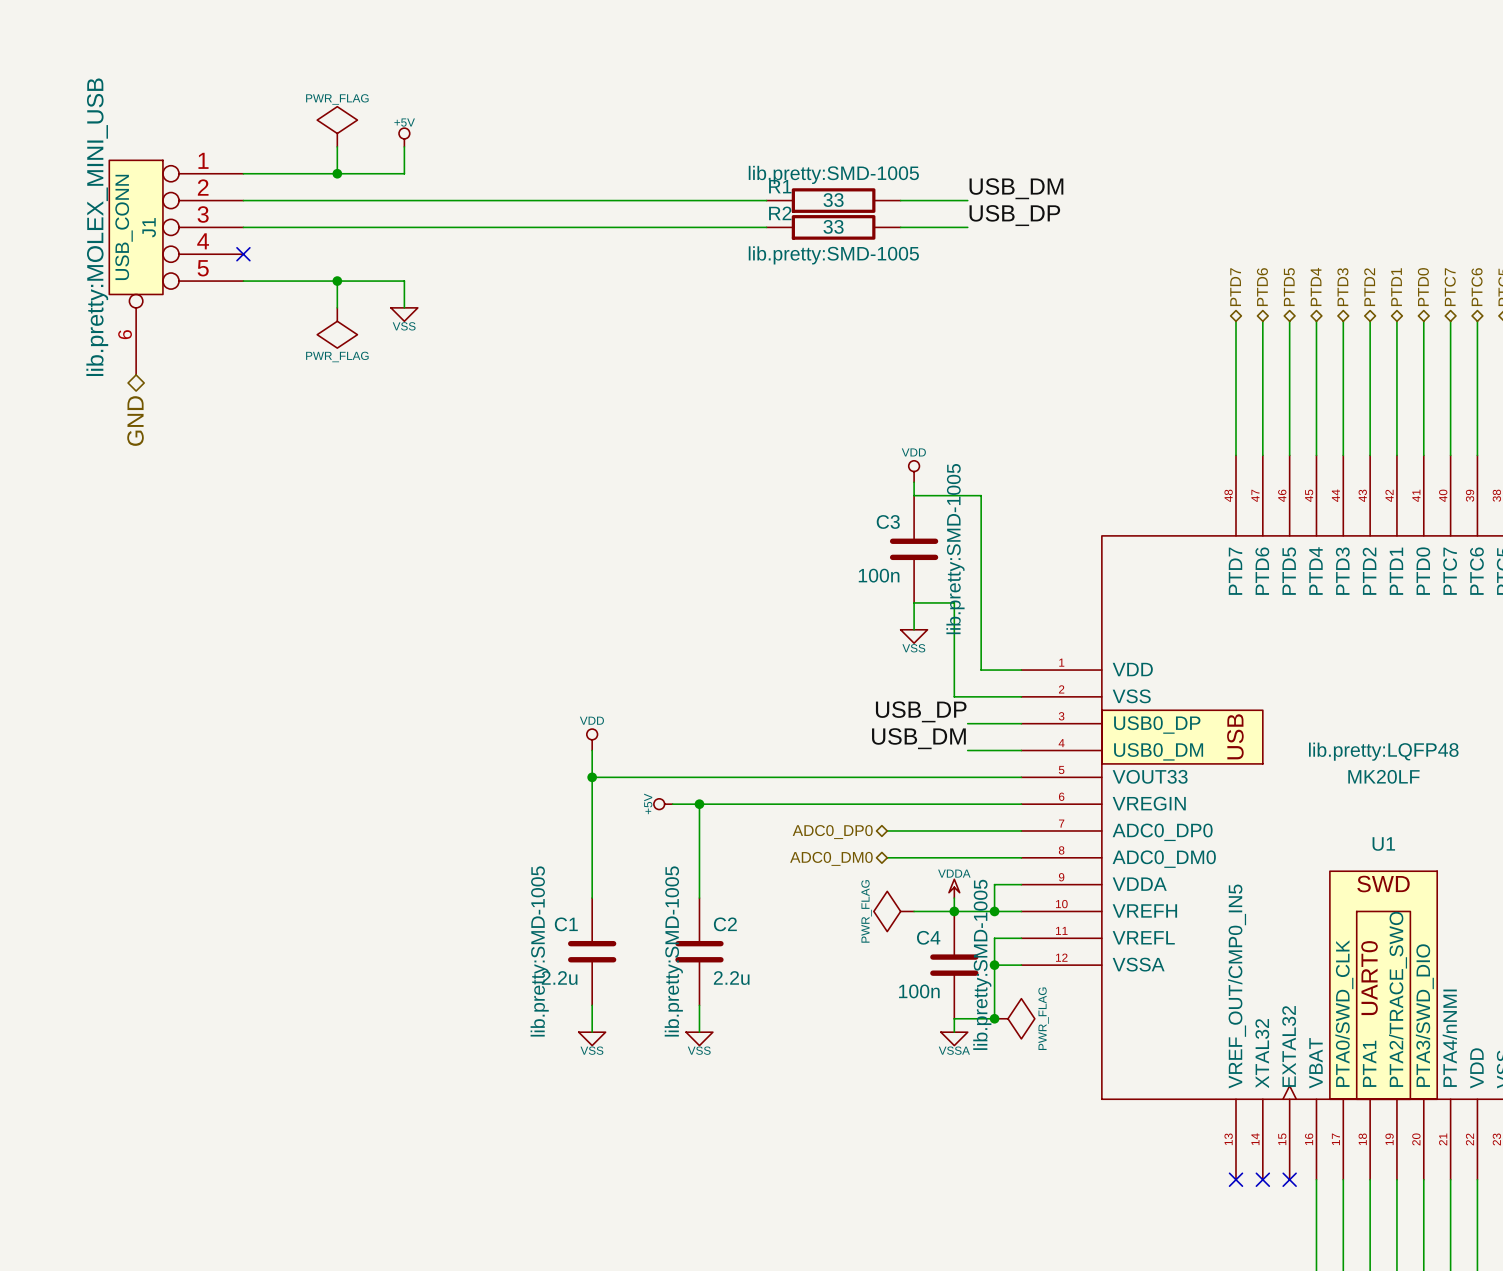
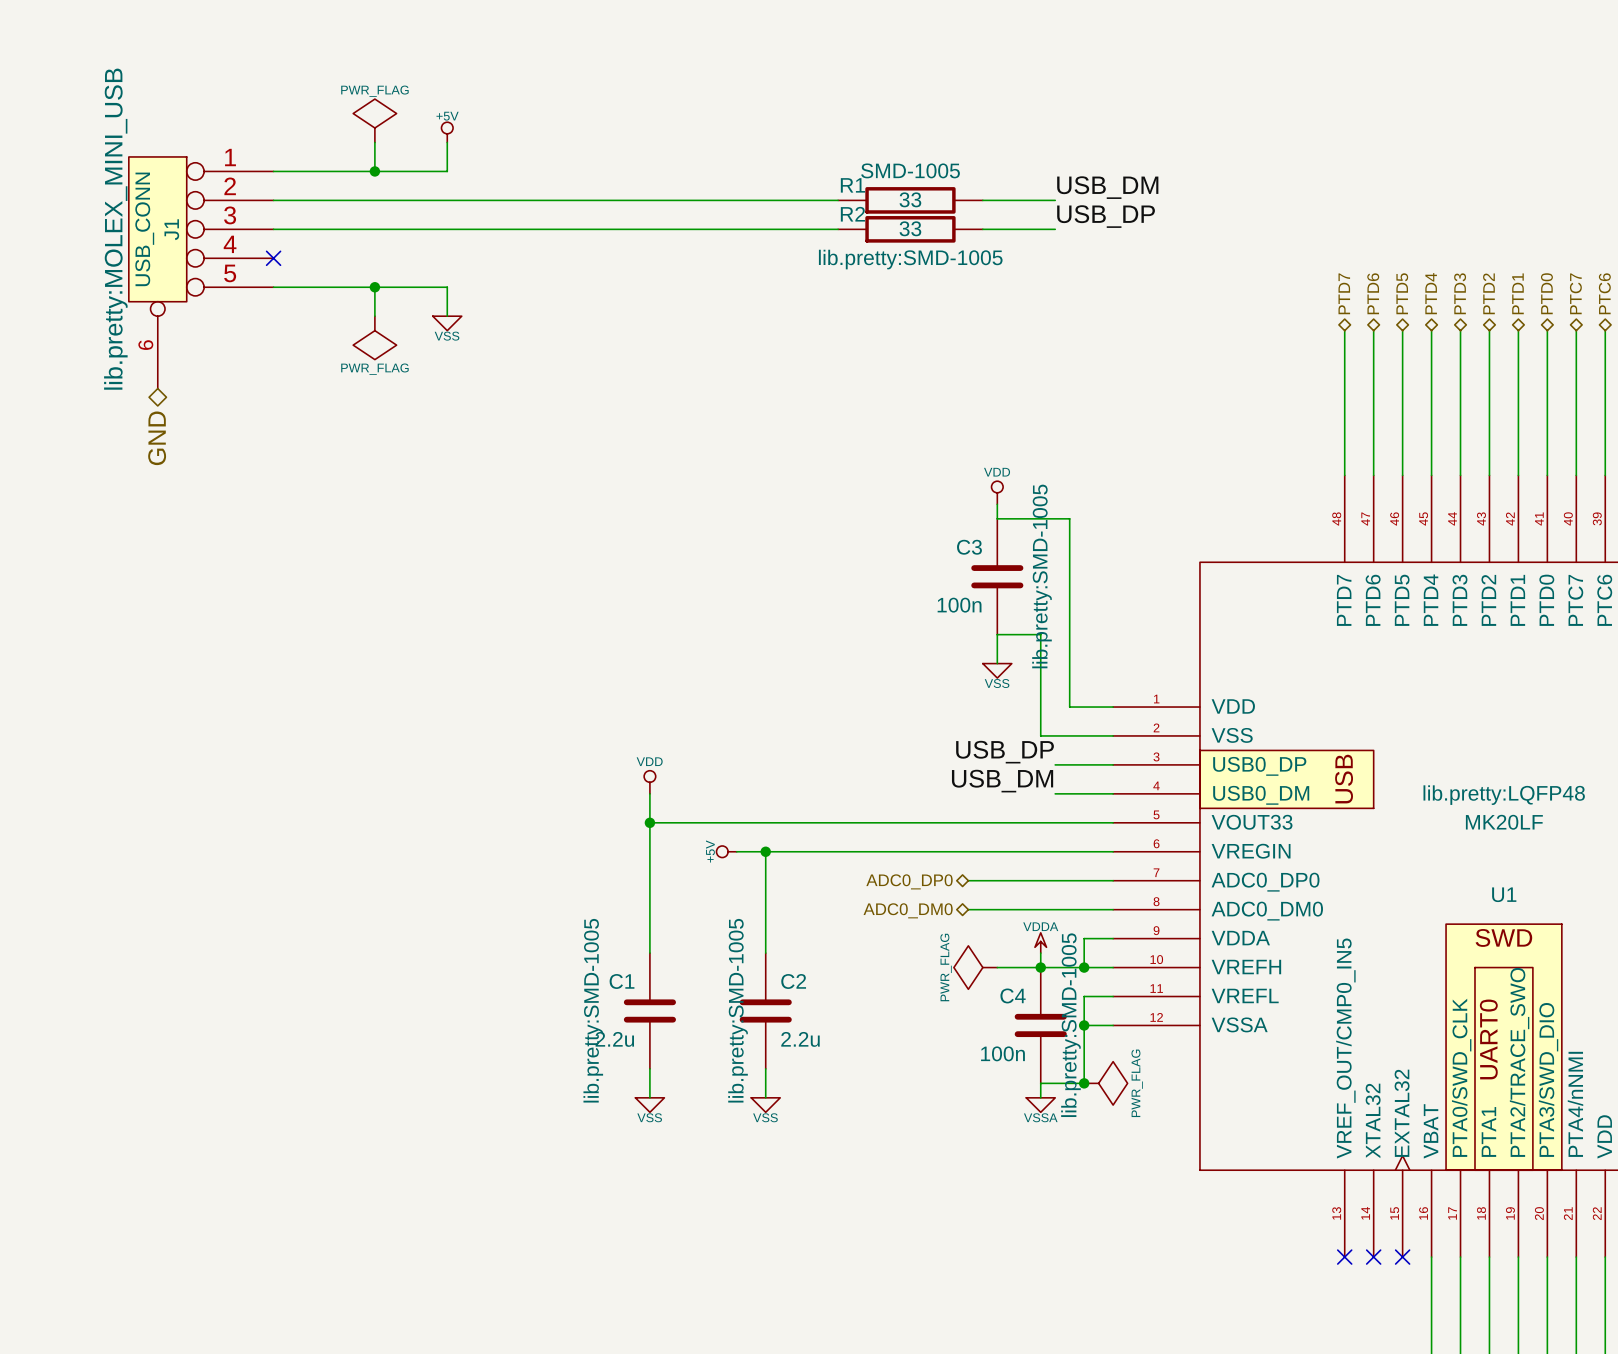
R1 text: lib.pretty:SMD-1005 (833, 174) -> SMD-1005 (910, 170)

